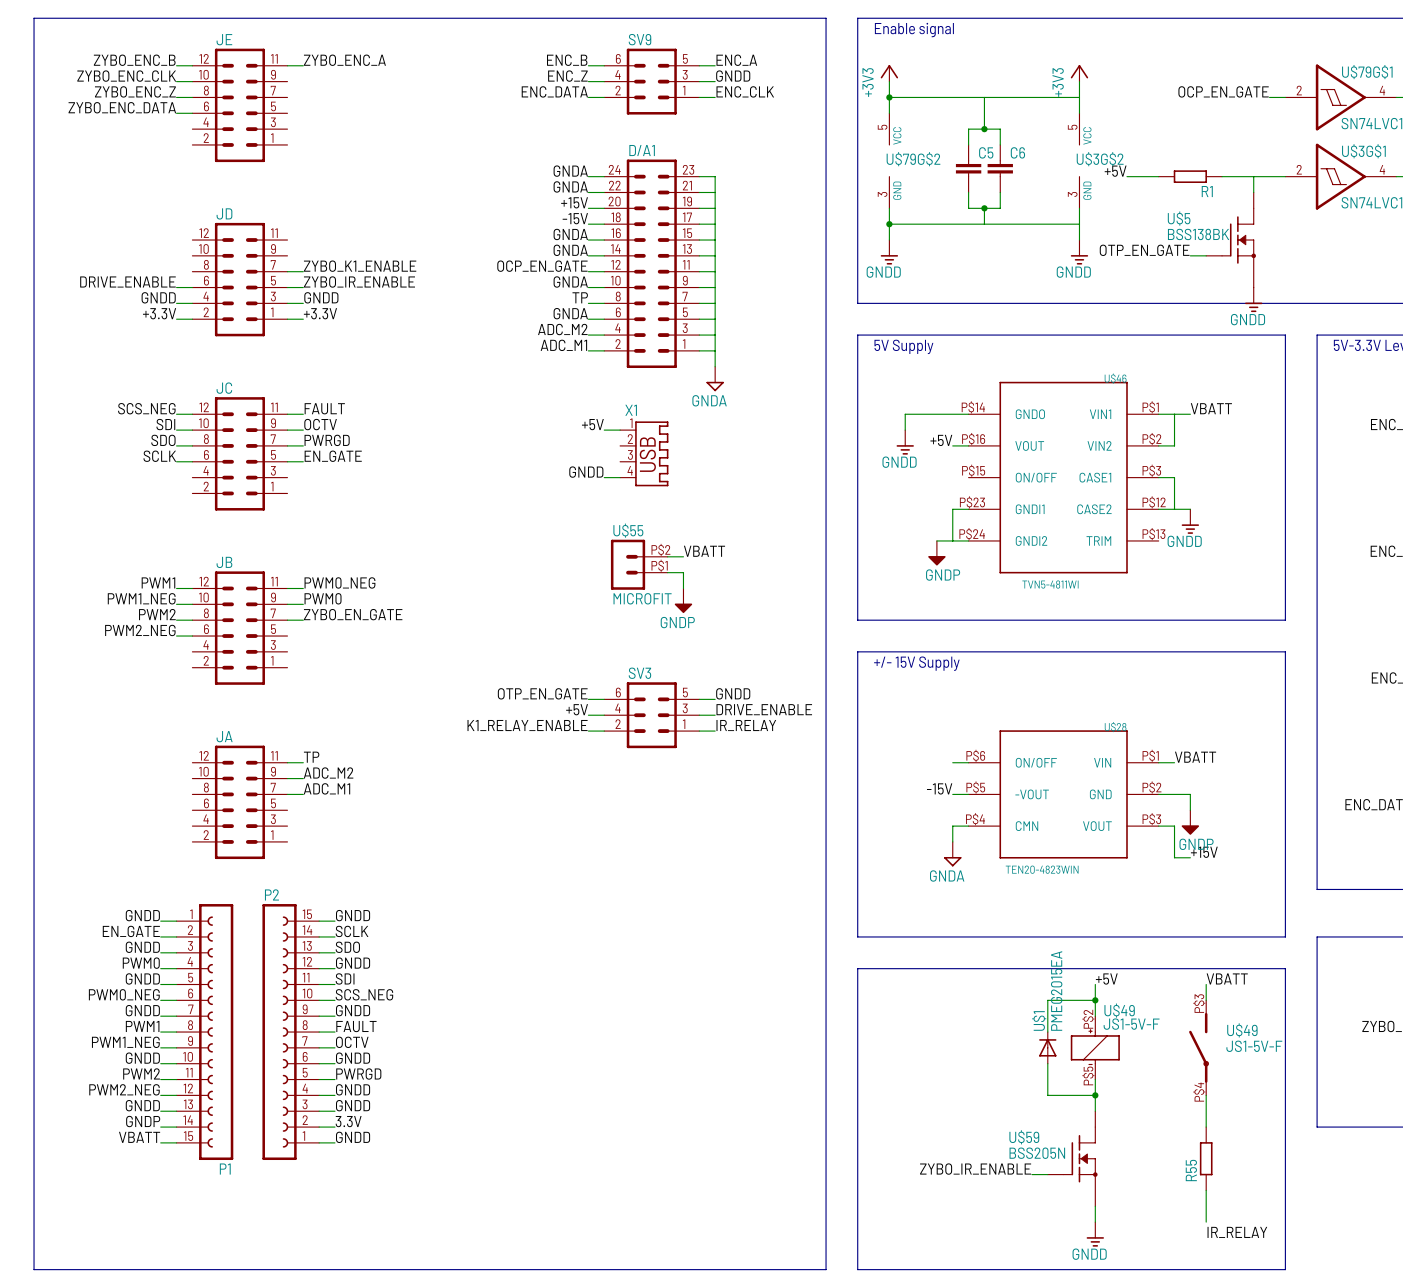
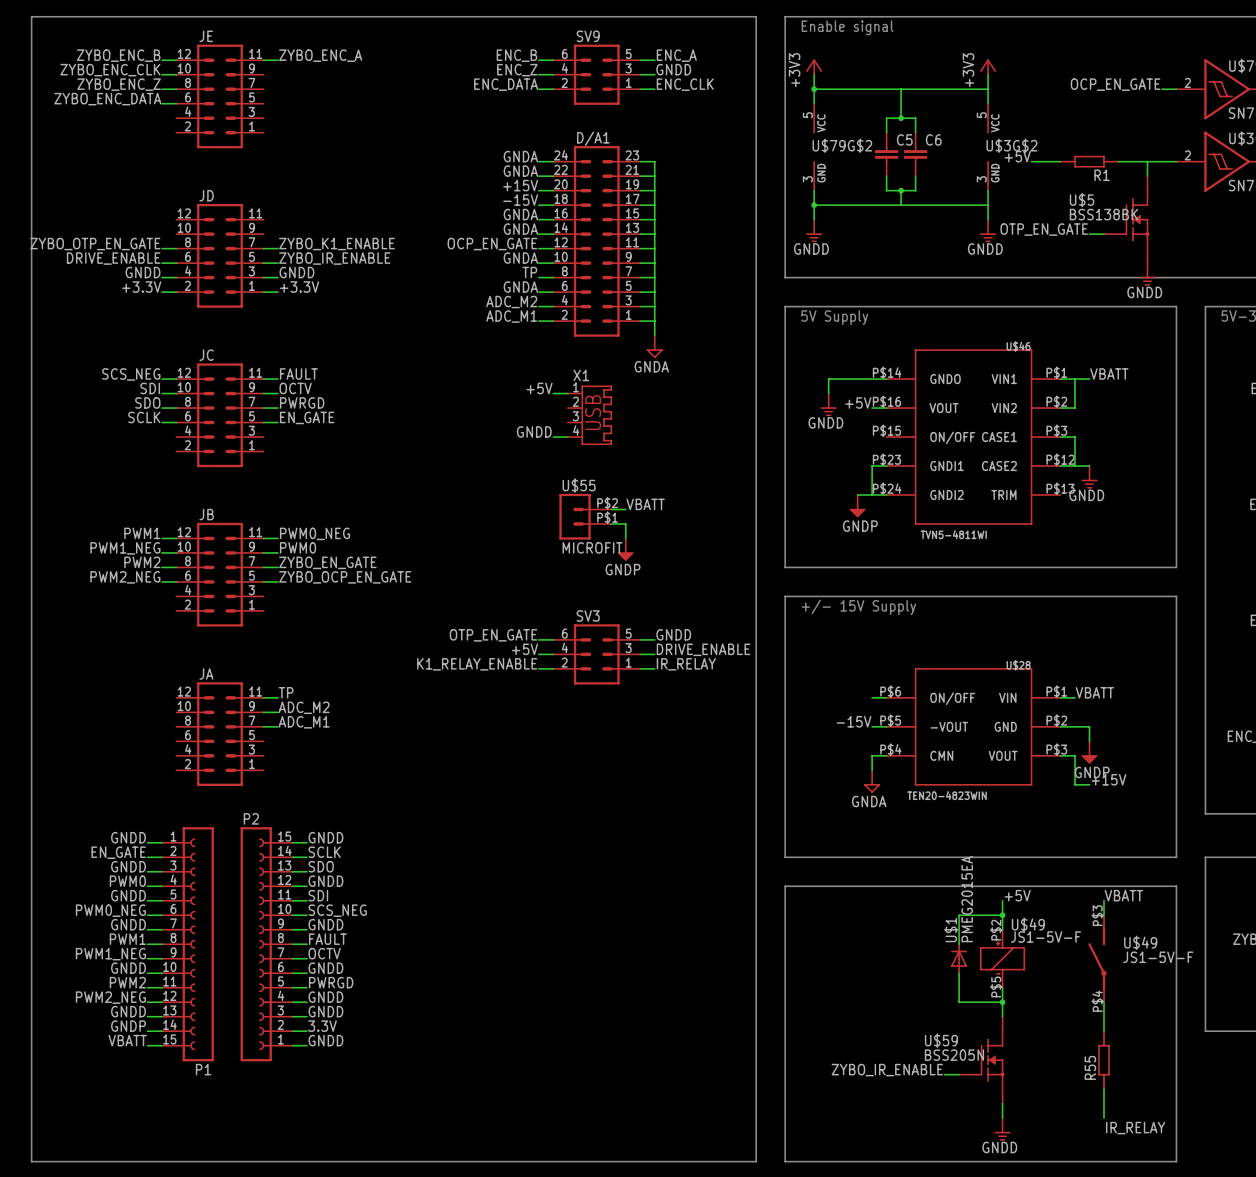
label: none -> ZYBO_OTP_EN_GATE (95, 244)
wire: none -> (162, 248) (176, 248)
label: none -> ZYBO_OCP_EN_GATE (345, 577)
wire: none -> (263, 581) (277, 581)

